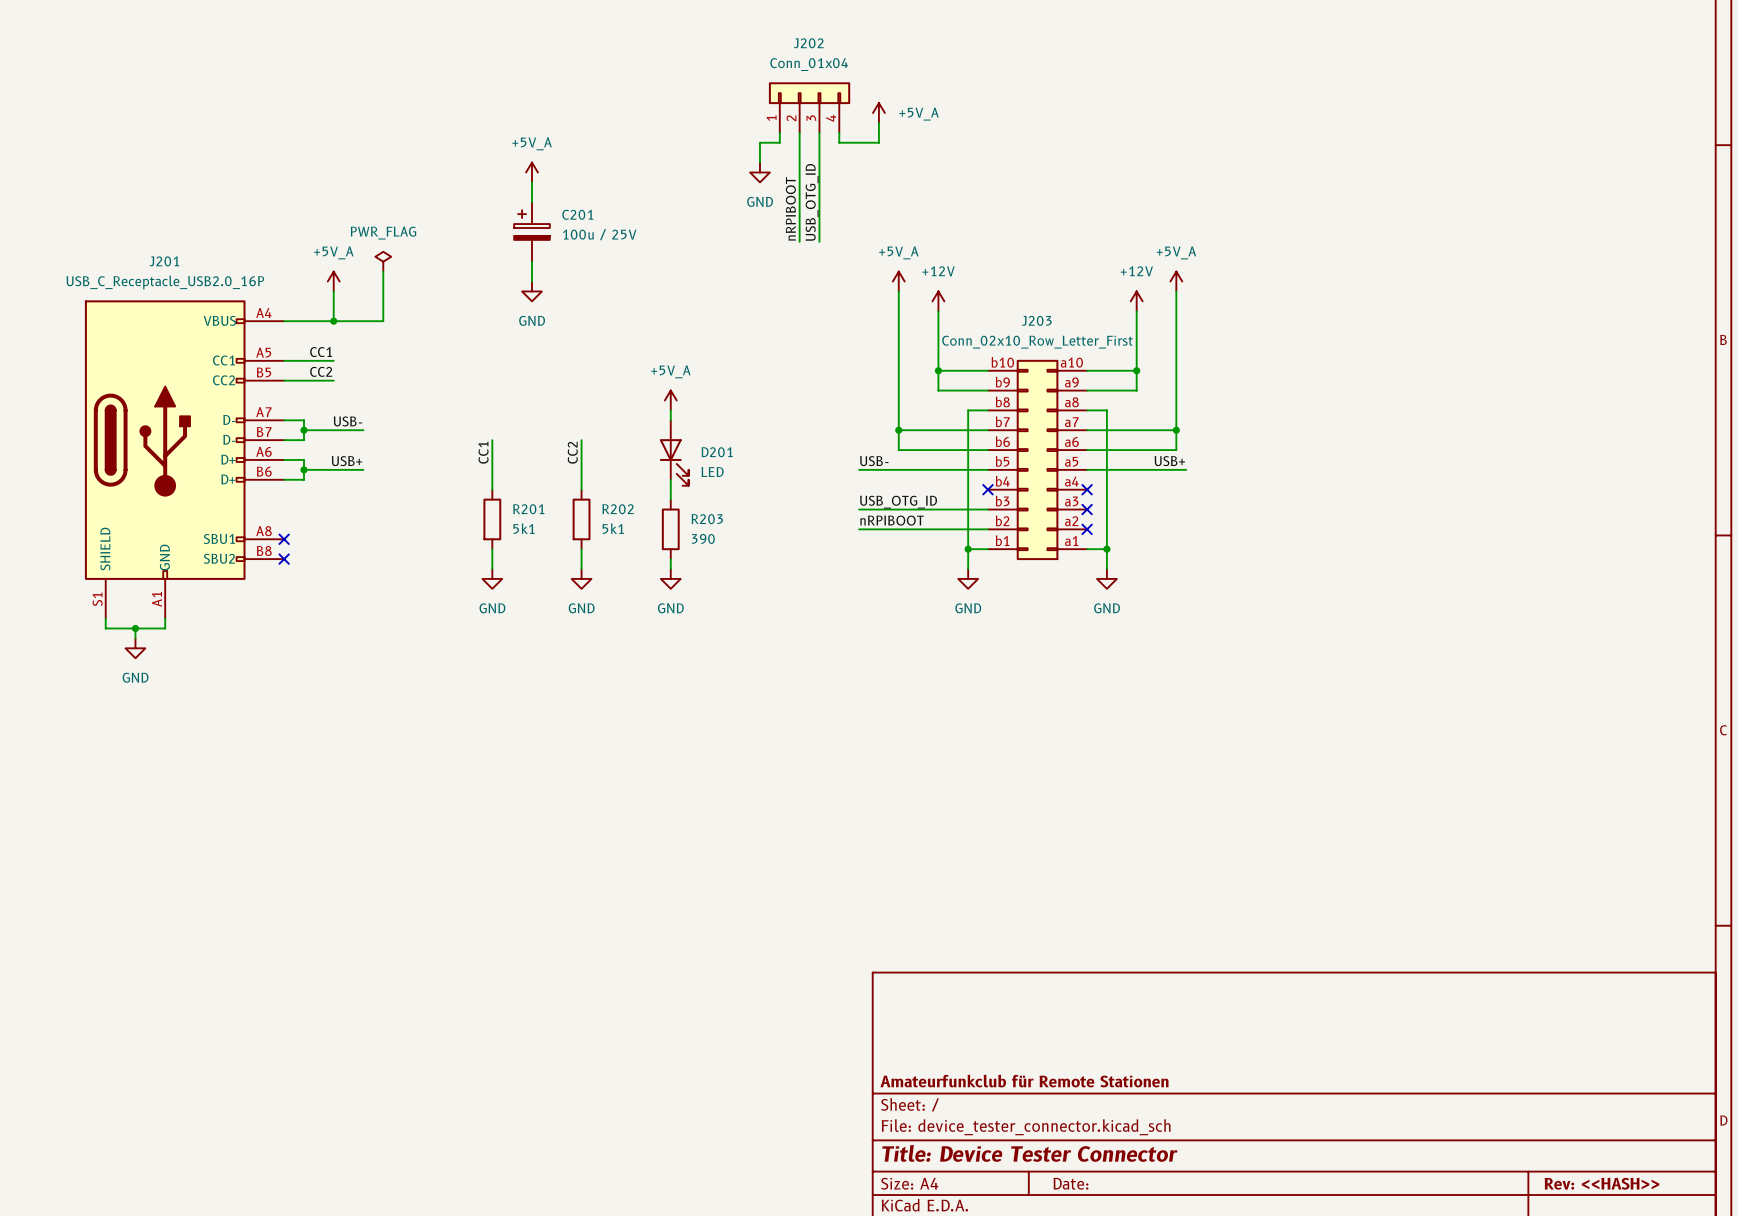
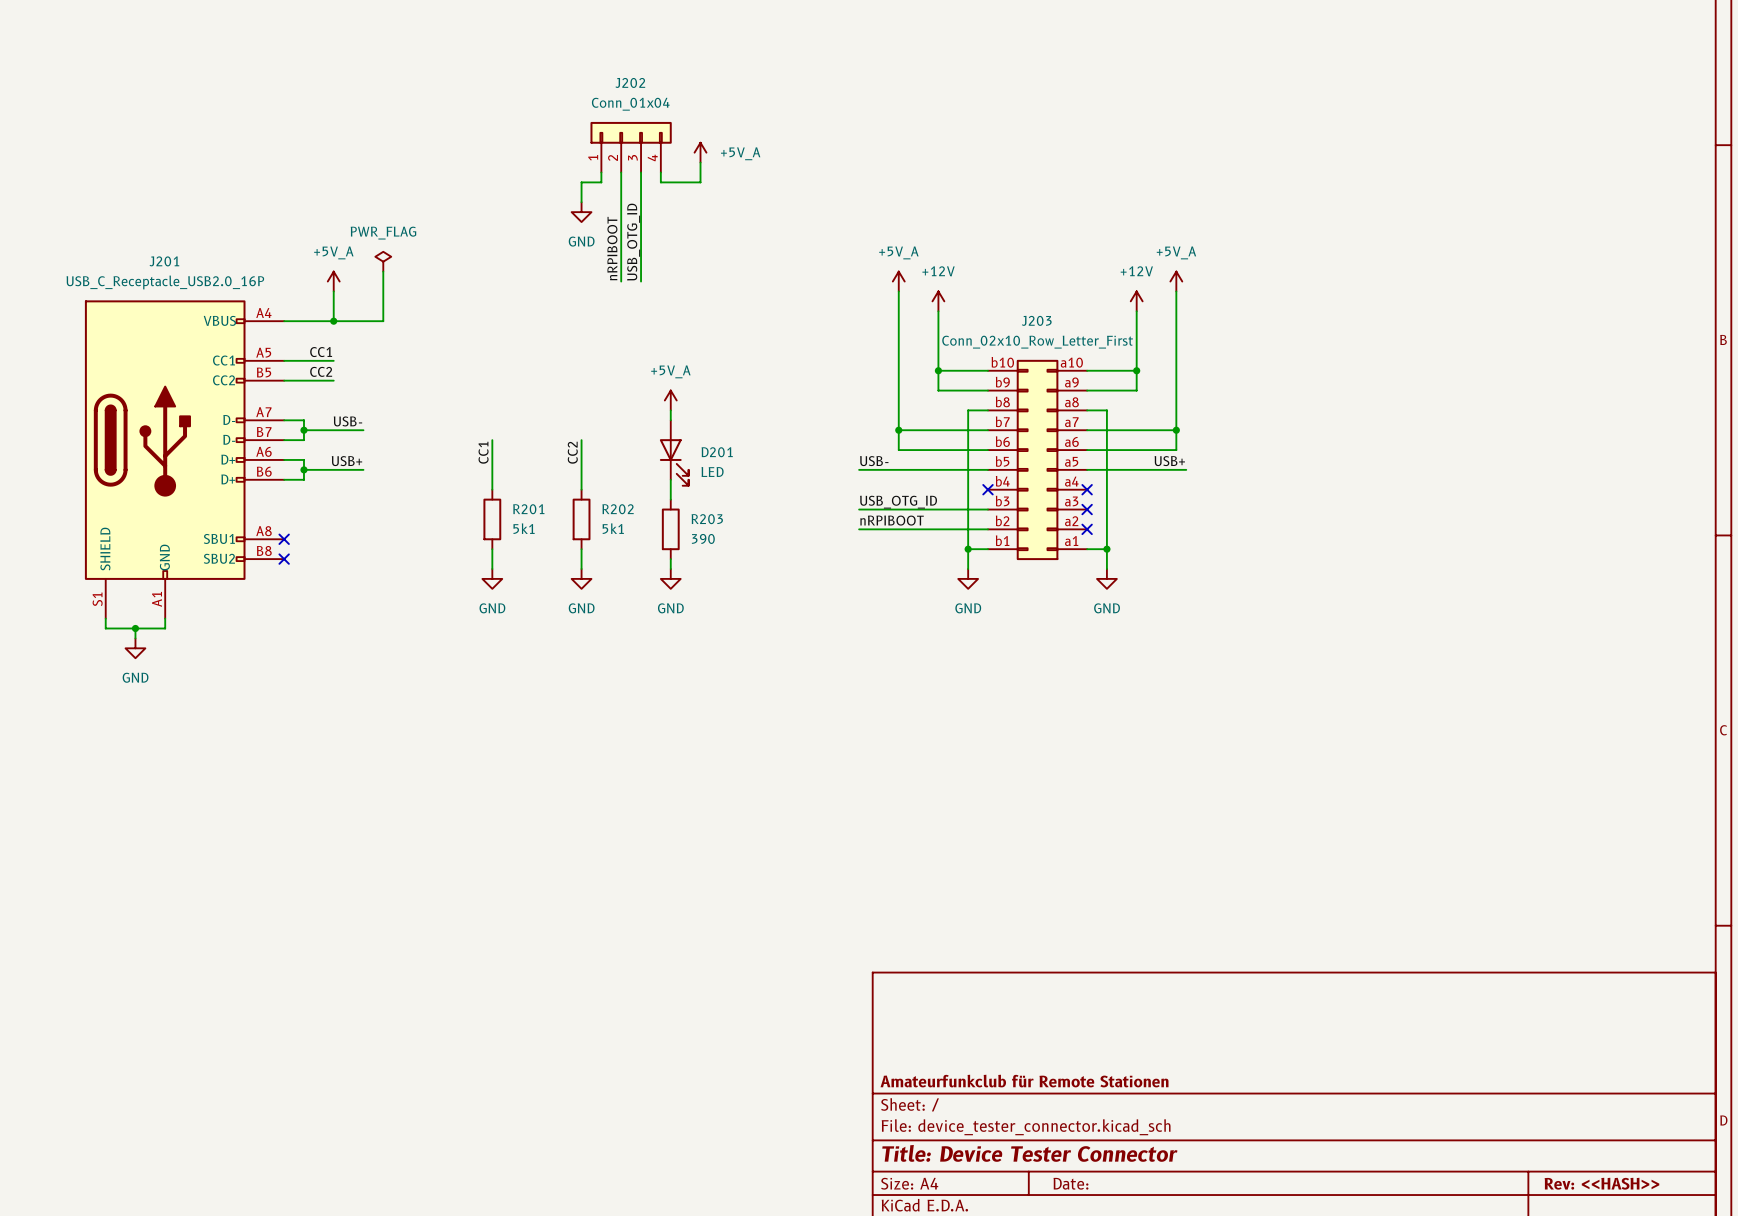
J202 position: (809, 107) -> (631, 147)
power symbol: +5V_A (878, 113) -> none
wire: (878, 122) (878, 142) (839, 142) (839, 132) -> (700, 162) (700, 182) (660, 182) (660, 172)
wire: (779, 132) (779, 142) (759, 142) (759, 162) -> (601, 172) (601, 182) (581, 182) (581, 202)
wire: (799, 132) (799, 241) -> (621, 172) (621, 281)
wire: (819, 132) (819, 241) -> (641, 172) (641, 281)
power symbol: none -> +5V_A (700, 152)
power symbol: +5V_A (531, 172) -> none
power symbol: GND (759, 172) -> none
wire: (531, 182) (531, 202) -> none
label position: USB_OTG_ID (812, 202) -> USB_OTG_ID (633, 242)
label position: nRPIBOOT (790, 208) -> nRPIBOOT (612, 248)
power symbol: none -> GND (581, 212)
C201: 100u / 25V (531, 231) -> none
wire: (531, 261) (531, 281) -> none
power symbol: GND (531, 291) -> none

